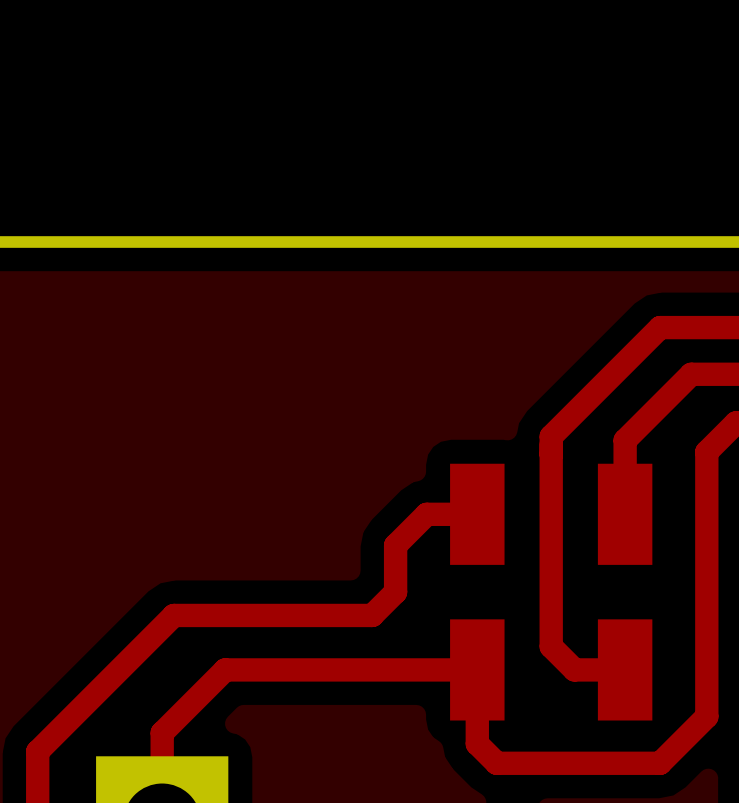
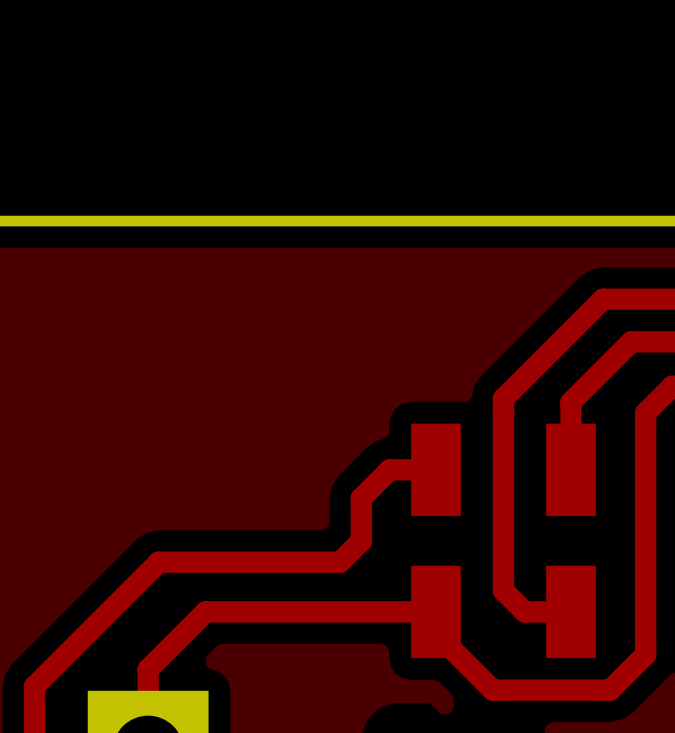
top track: (477, 693) (477, 743) (496, 763) (660, 763) (667, 755) -> (435, 633) (492, 690) (610, 690)

